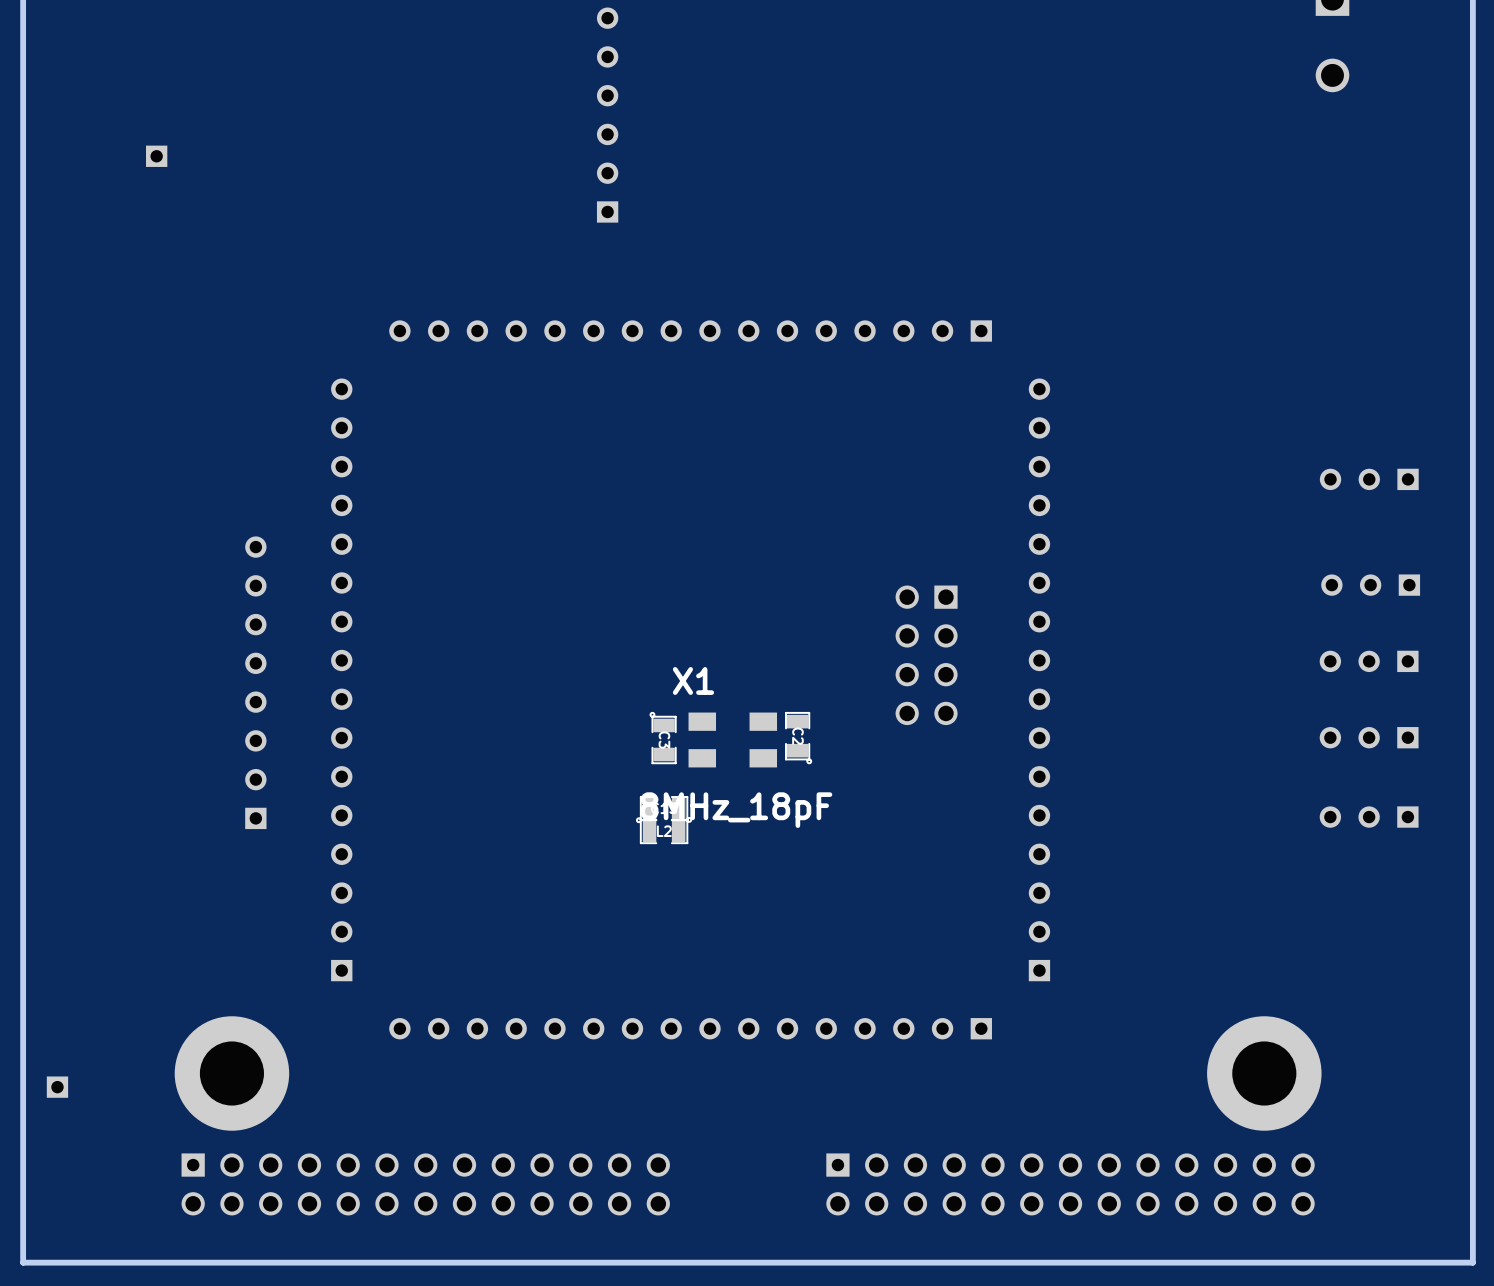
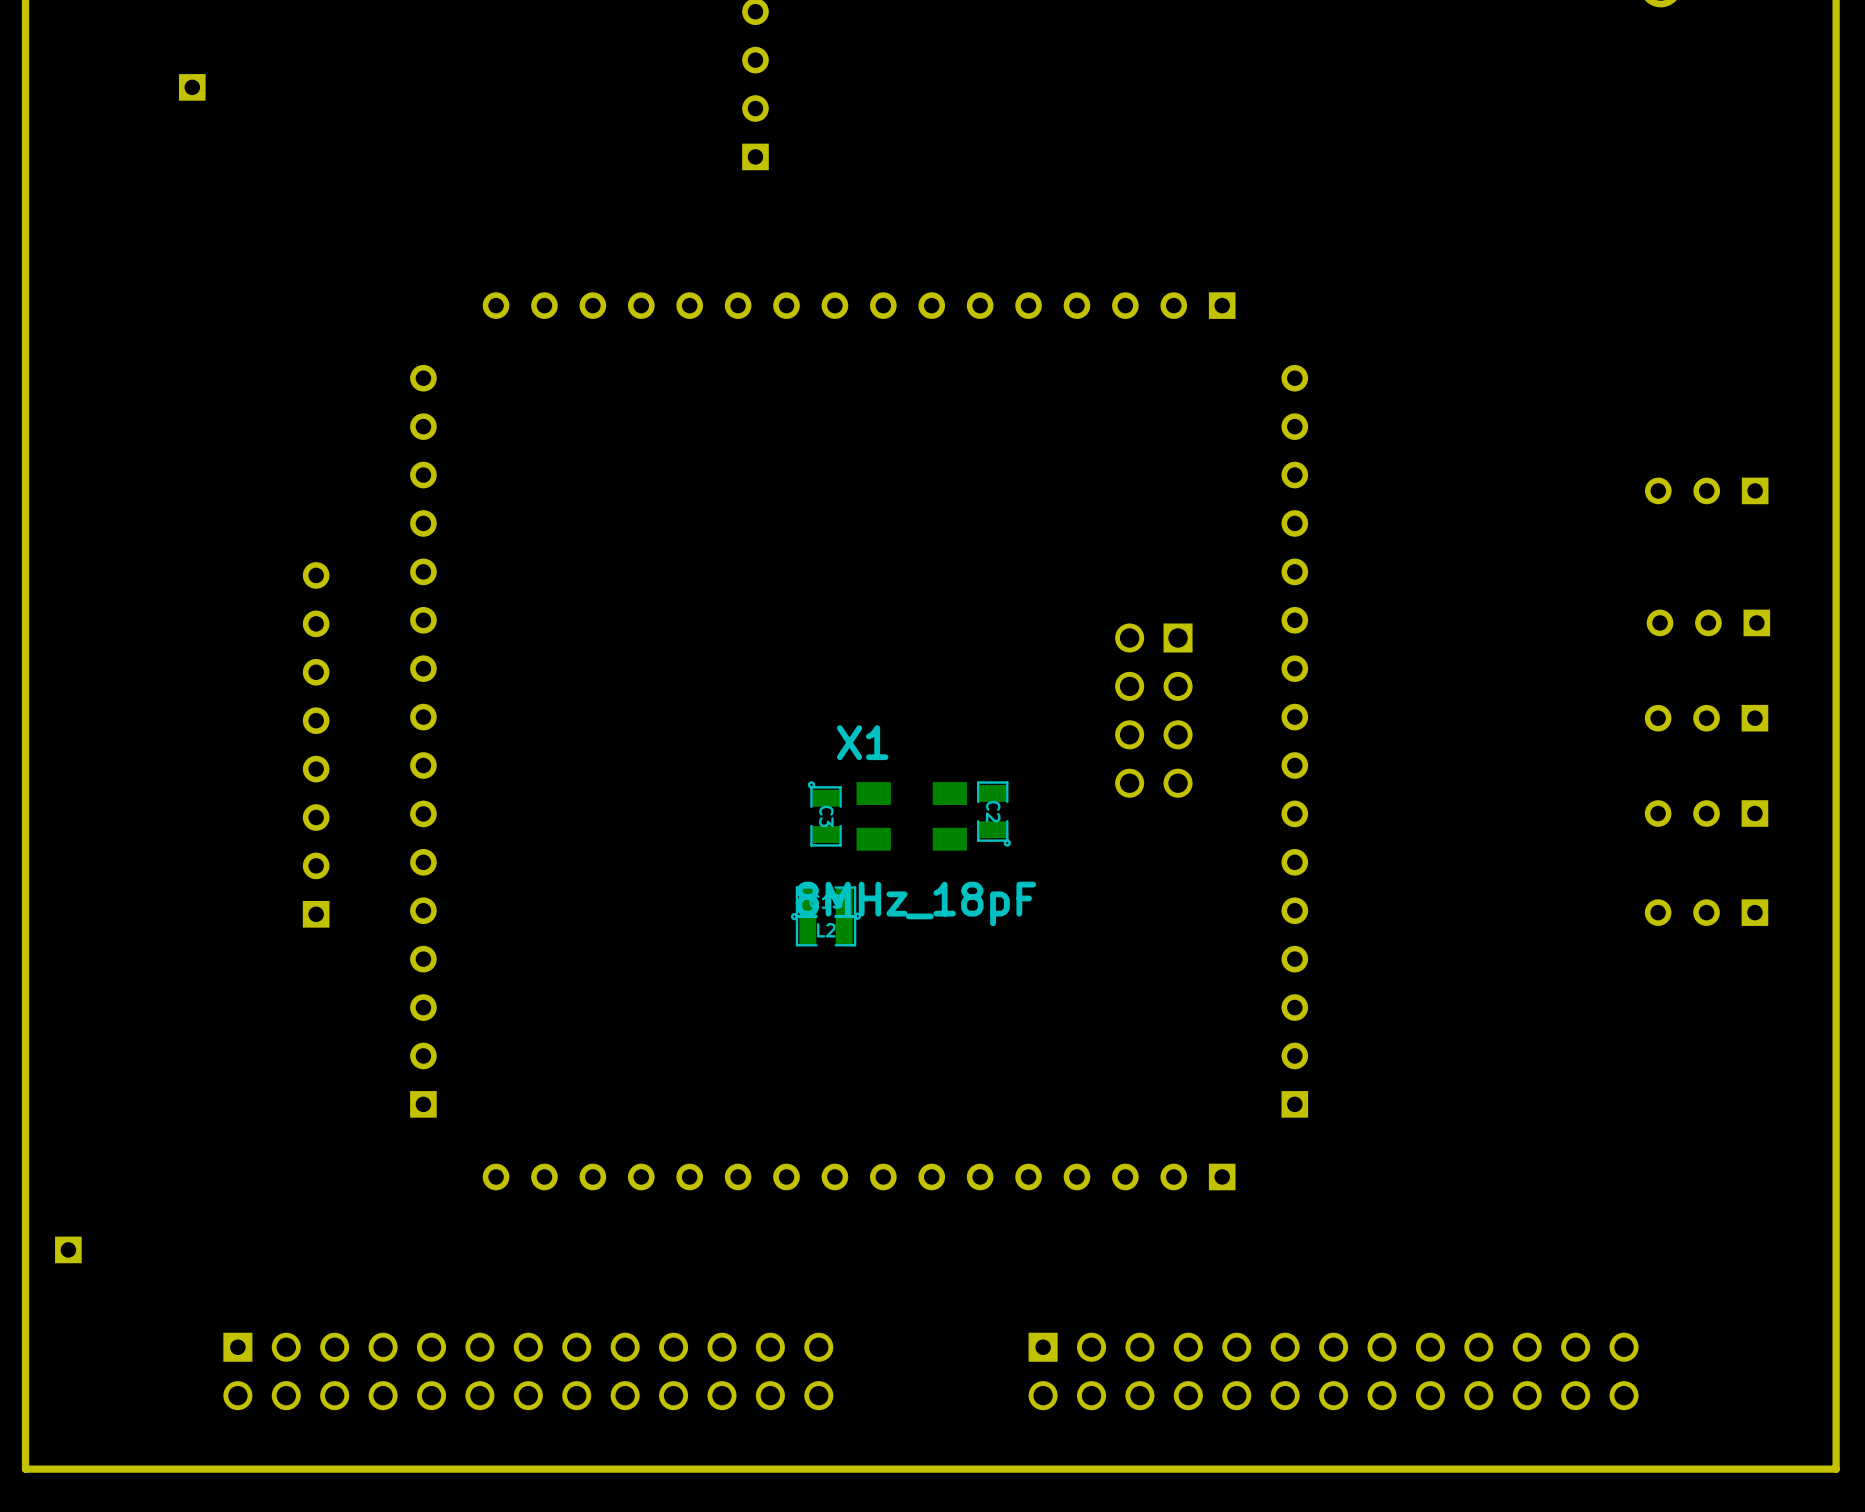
part: (231, 1073) -> none
part: (1264, 1073) -> none

